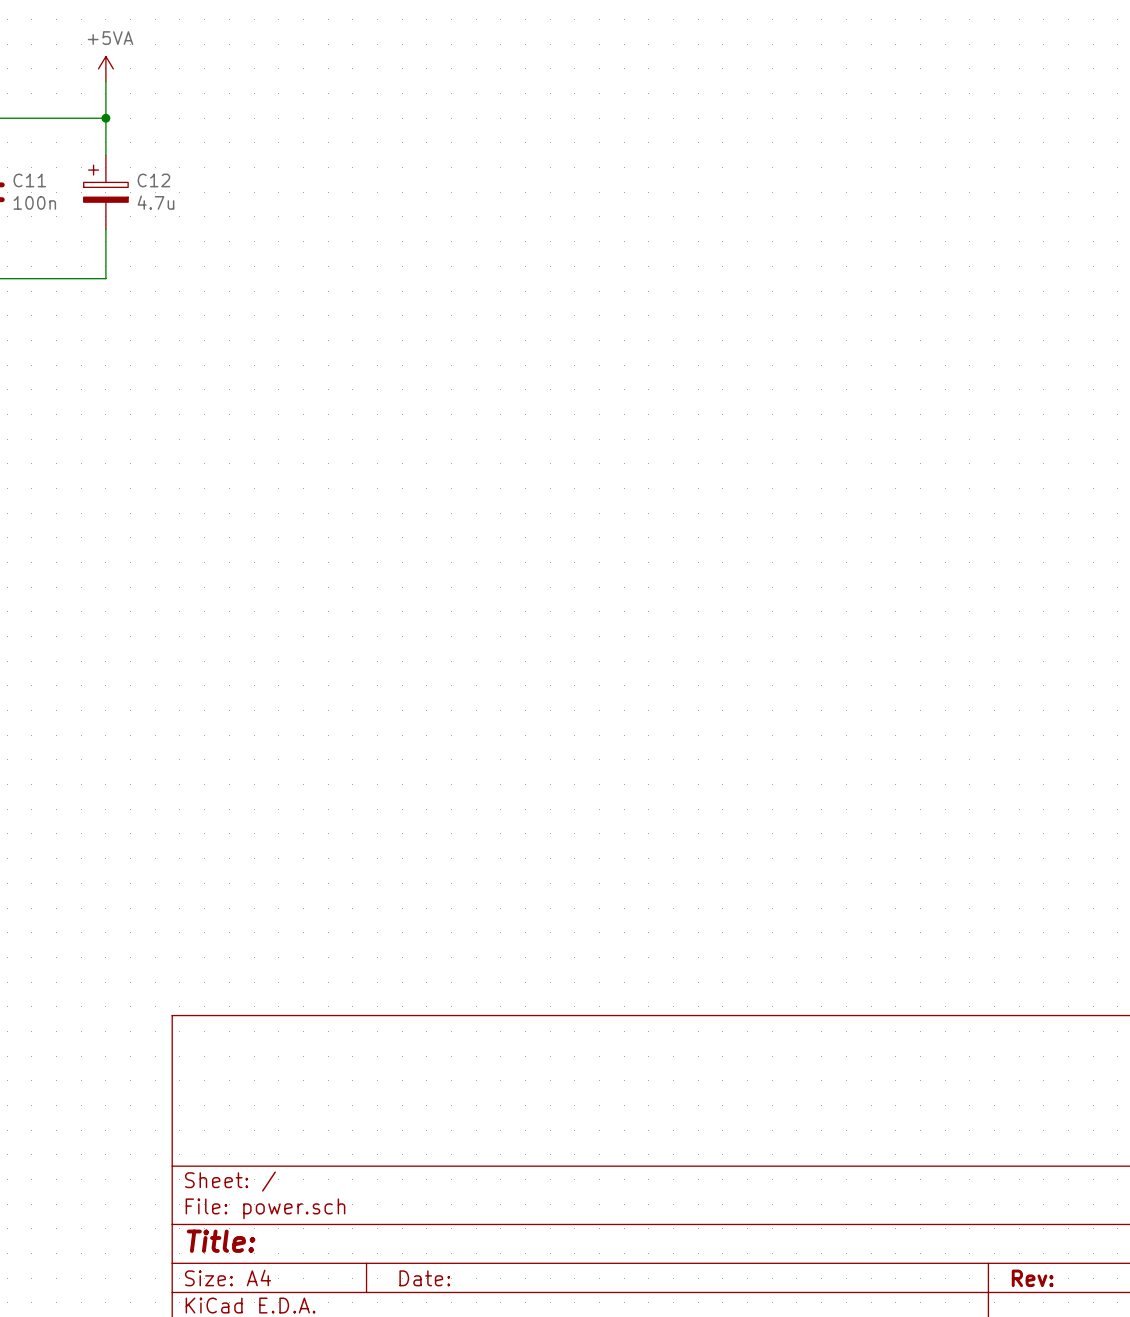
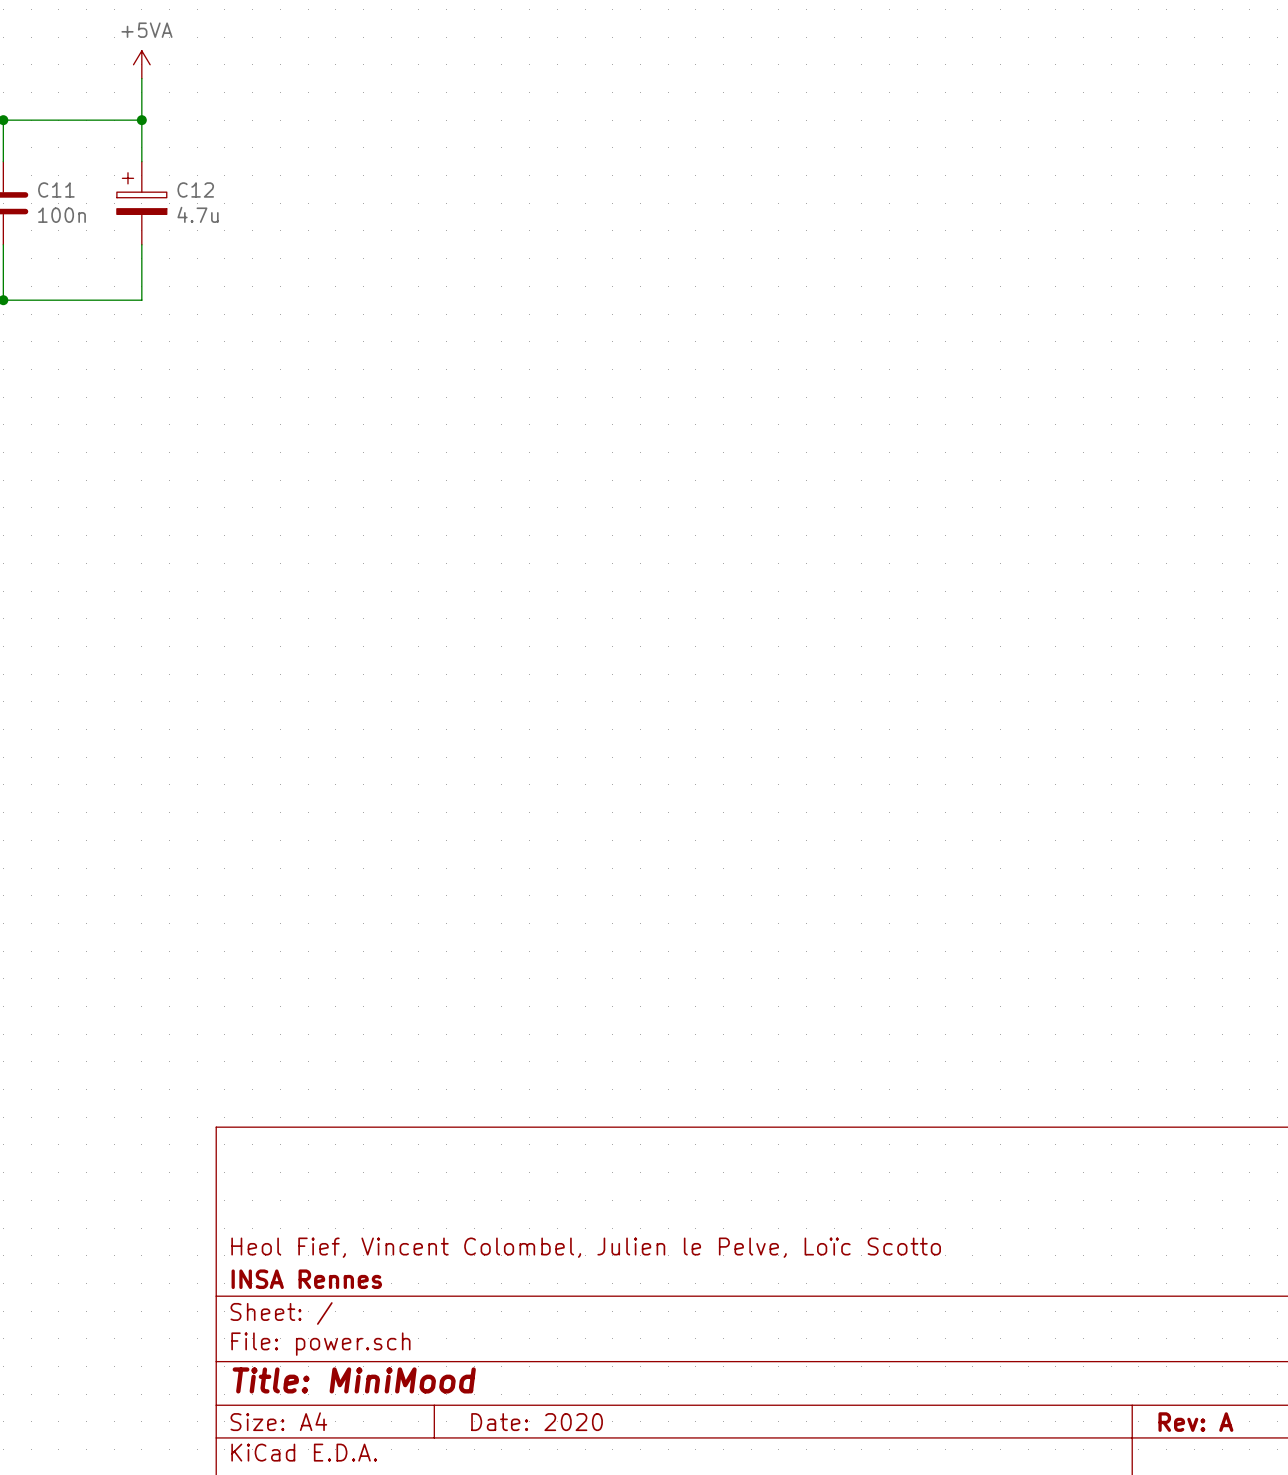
title block: none -> Heol Fief, Vincent Colombel, Julien le Pelve, Loïc Scotto (586, 1247)
title block: none -> INSA Rennes (306, 1279)
title block: Title: (221, 1241) -> Title: MiniMood (354, 1380)
title block: Date: (424, 1278) -> Date: 2020 (537, 1422)
title block: Rev: (1032, 1278) -> Rev: A (1195, 1422)

